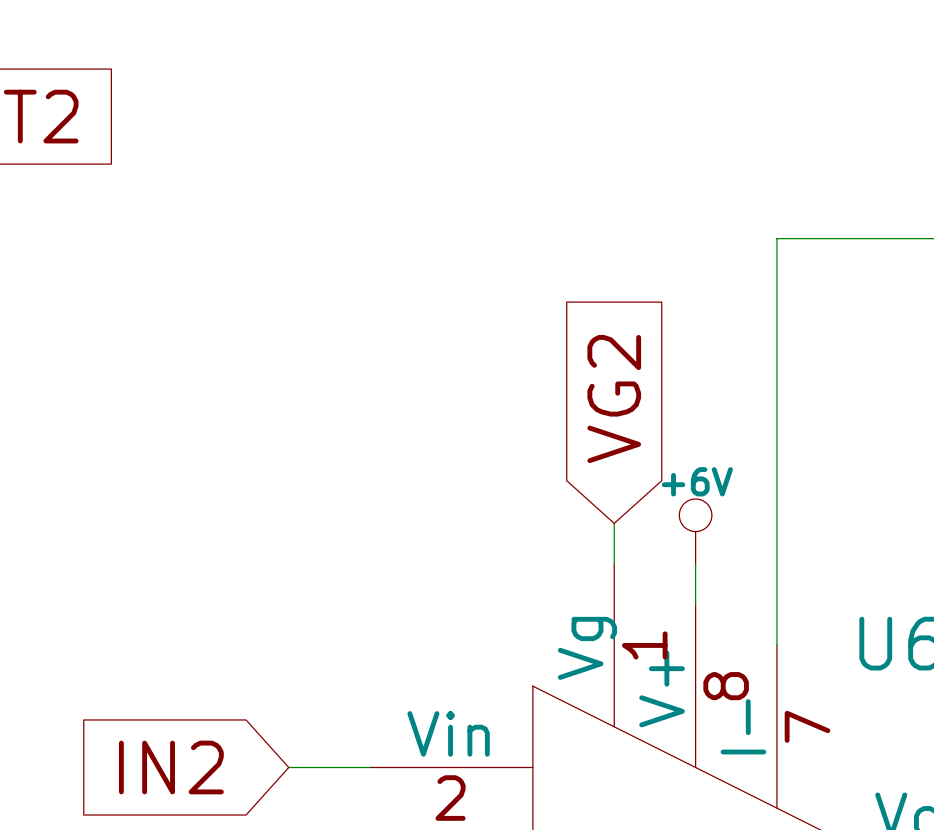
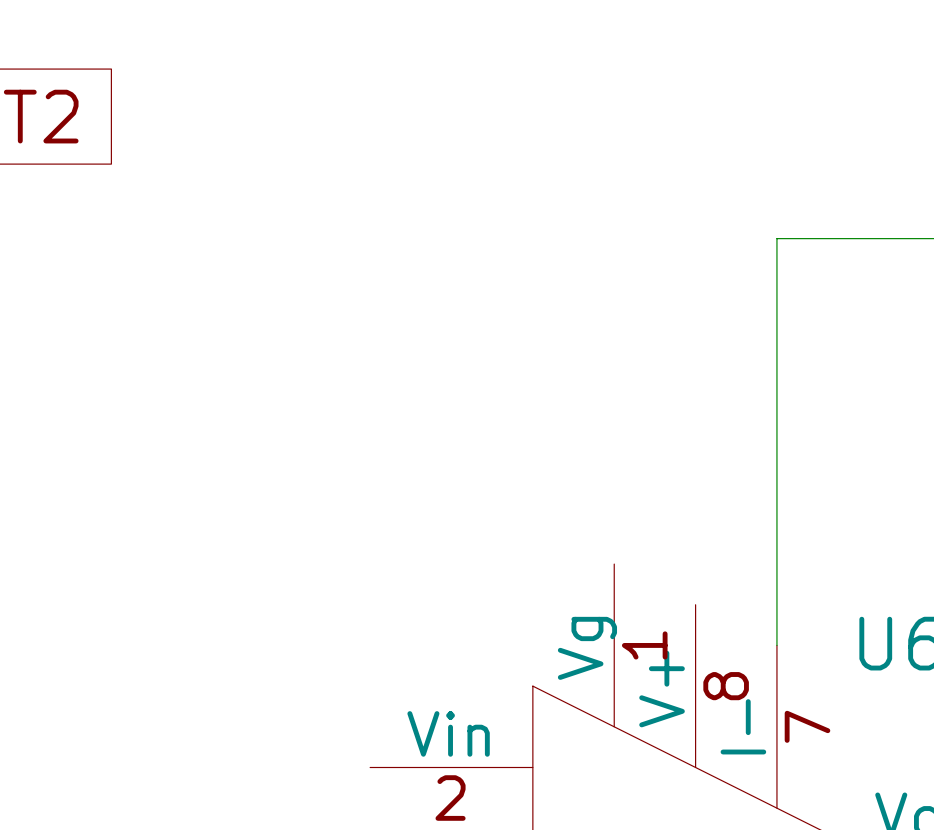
global label: VG2 (614, 399) -> none
wire: (614, 523) (614, 564) -> none
power symbol: +6V (695, 531) -> none
wire: (695, 564) (695, 604) -> none
global label: IN2 (171, 767) -> none
wire: (288, 767) (370, 767) -> none

